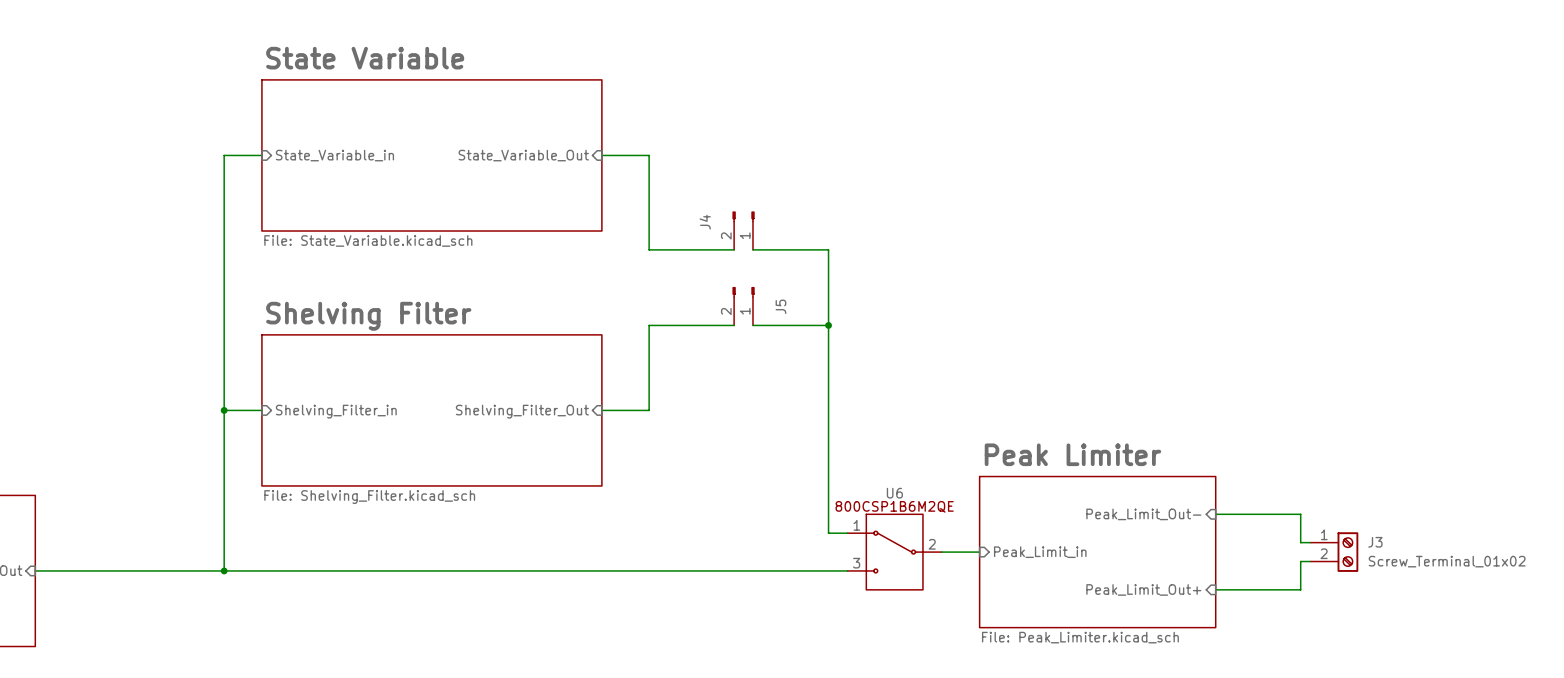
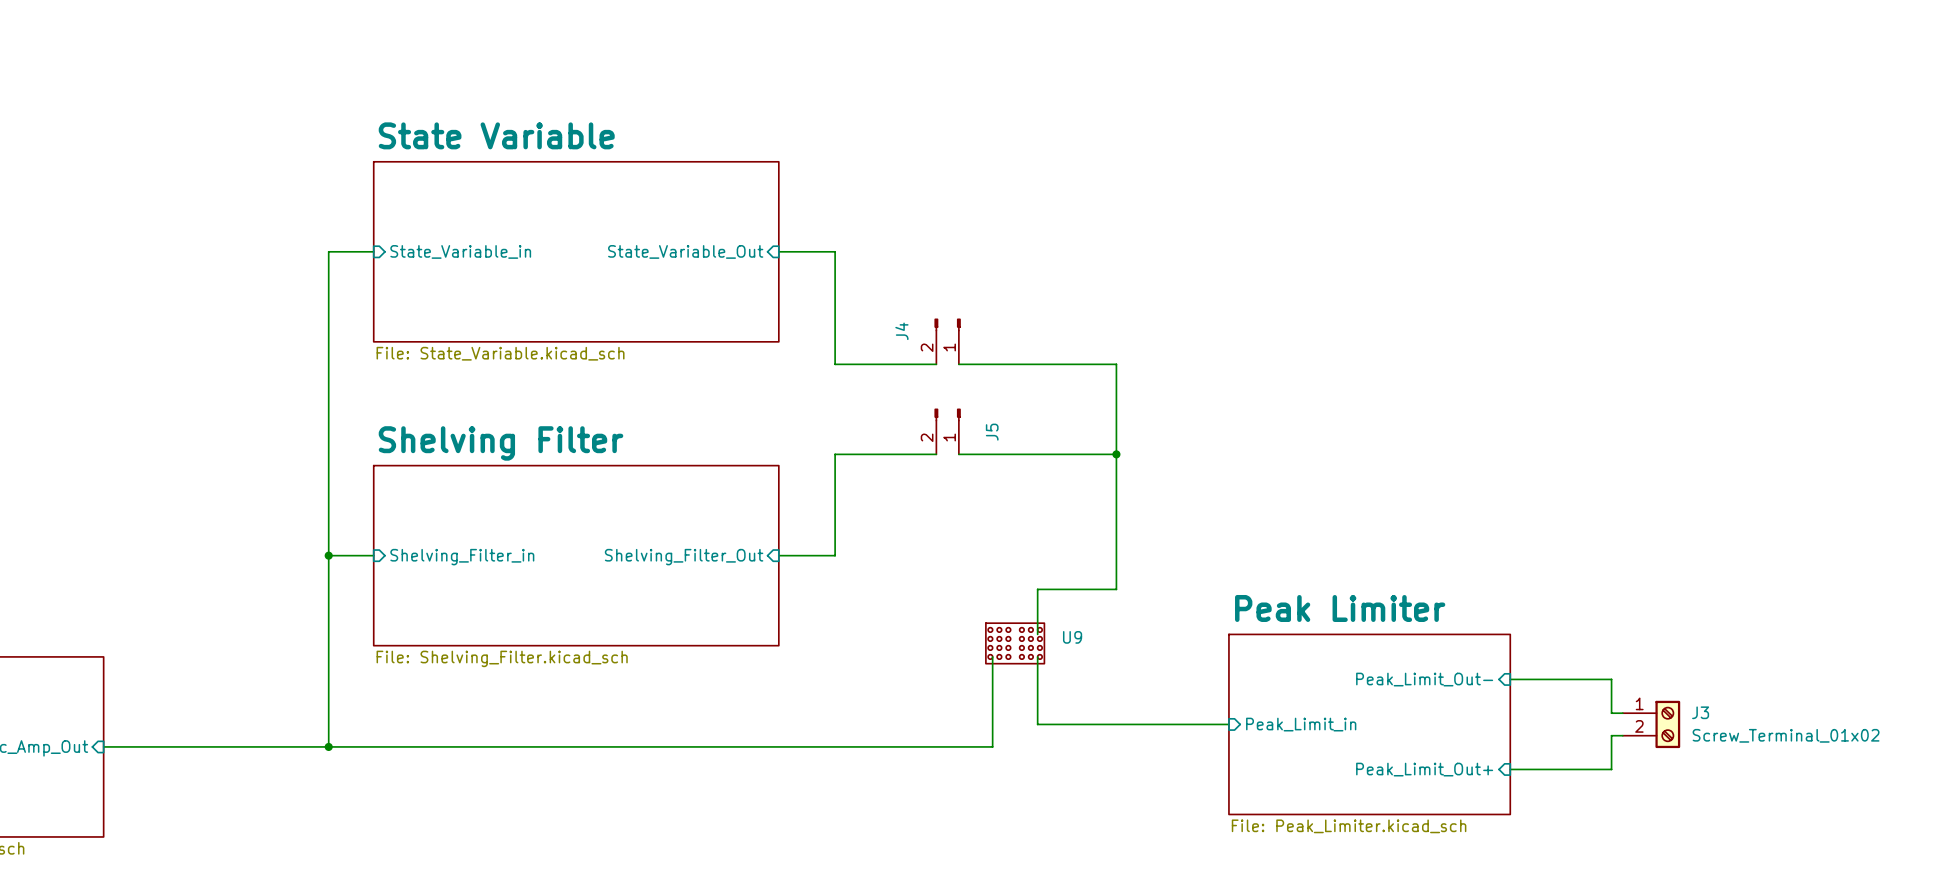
wire: (828, 249) (828, 533) (847, 533) -> (1048, 364) (1116, 364) (1116, 589) (1037, 589) (1037, 634)
wire: none -> (1048, 454) (1116, 454)
junction: (828, 325) -> none
junction: none -> (1116, 454)
U9: none -> (1015, 643)
wire: none -> (1037, 656) (1037, 724) (1183, 724)
U6: (894, 552) -> none
wire: (781, 570) (847, 570) -> (992, 746) (992, 656)

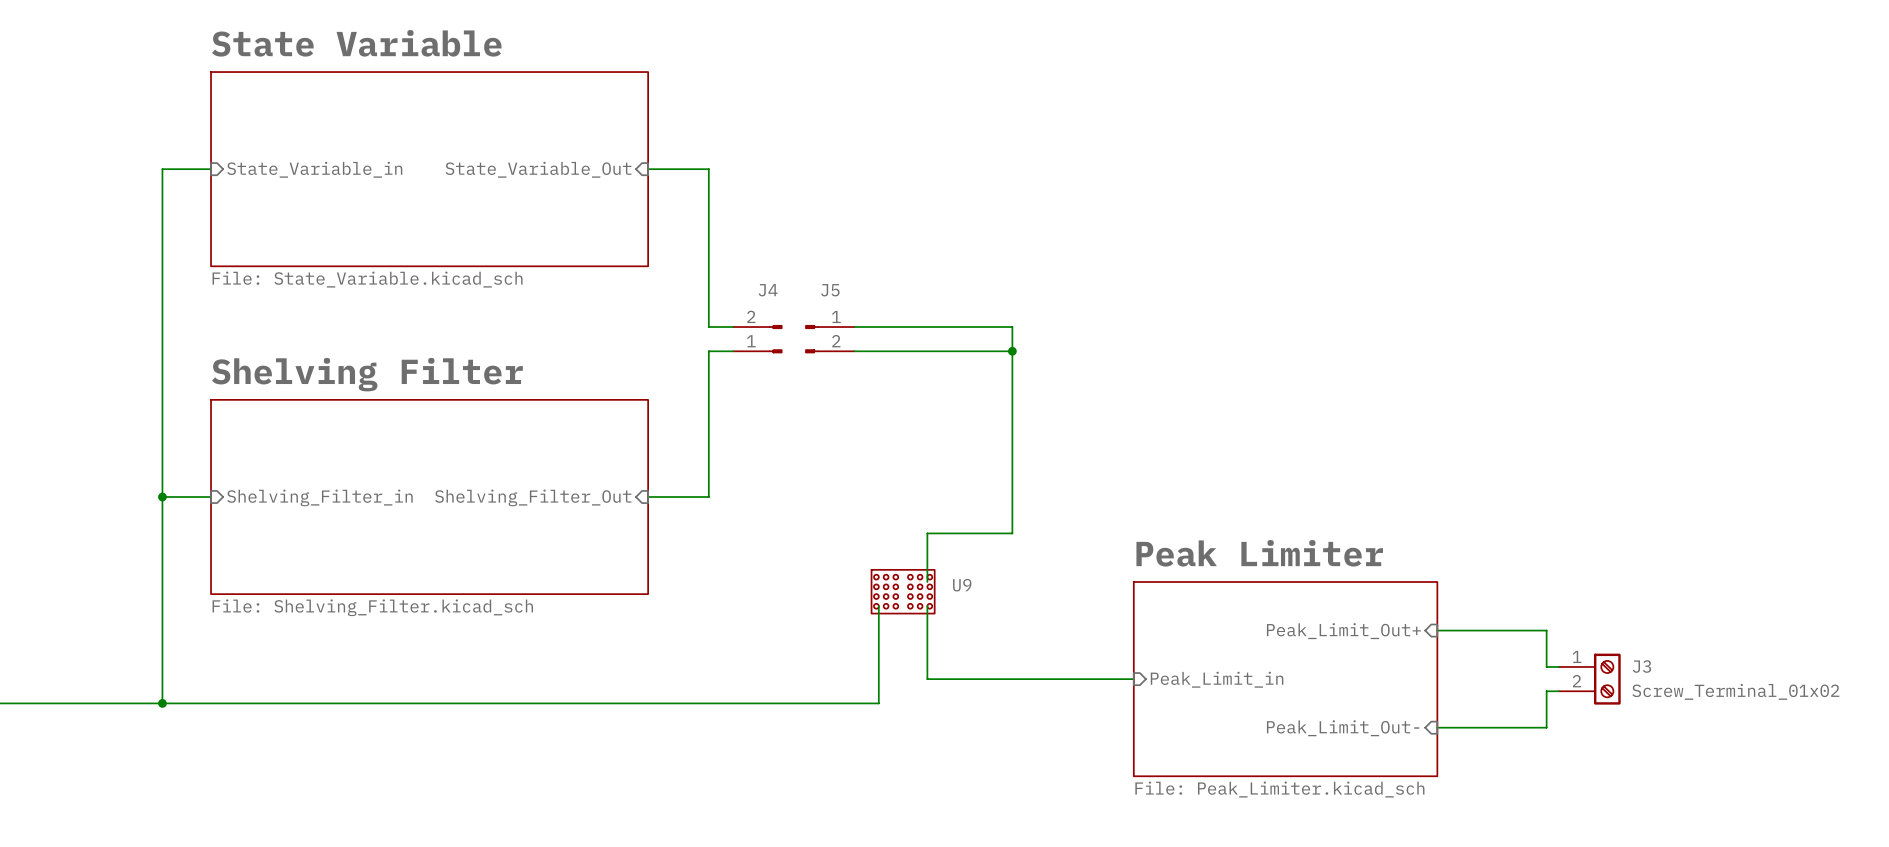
J4 rotation: 0° (947, 324) -> 90° clockwise (775, 339)
J4 position: (947, 341) -> (757, 339)
wire: (835, 364) (936, 364) -> (708, 290) (708, 327) (733, 327)
wire: (958, 364) (1116, 364) (1116, 398) -> (854, 327) (1012, 327)
J5 rotation: 0° (947, 414) -> 90° counterclockwise (812, 339)
wire: none -> (854, 351) (1012, 351)
wire: (835, 454) (936, 454) -> (708, 387) (708, 351) (733, 351)
wire: (958, 454) (1116, 454) -> none
junction position: (1116, 454) -> (1012, 351)
sheet pin: Peak_Limit_Out- (1424, 679) -> Peak_Limit_Out+ (1343, 631)
sheet pin: Peak_Limit_Out+ (1424, 769) -> Peak_Limit_Out- (1343, 728)

